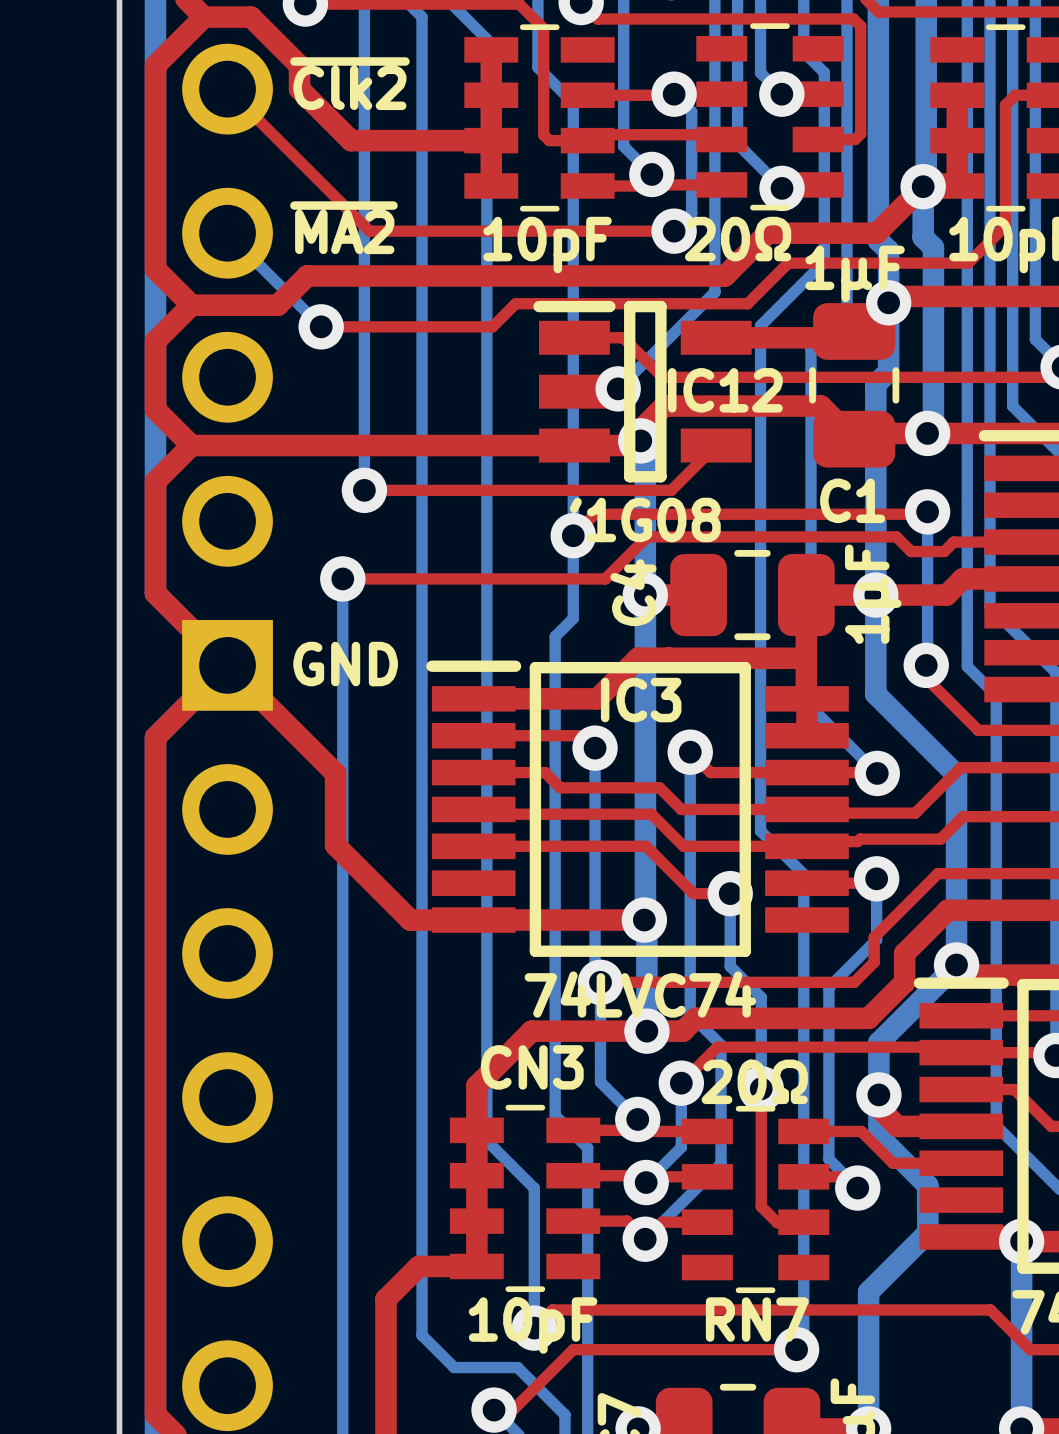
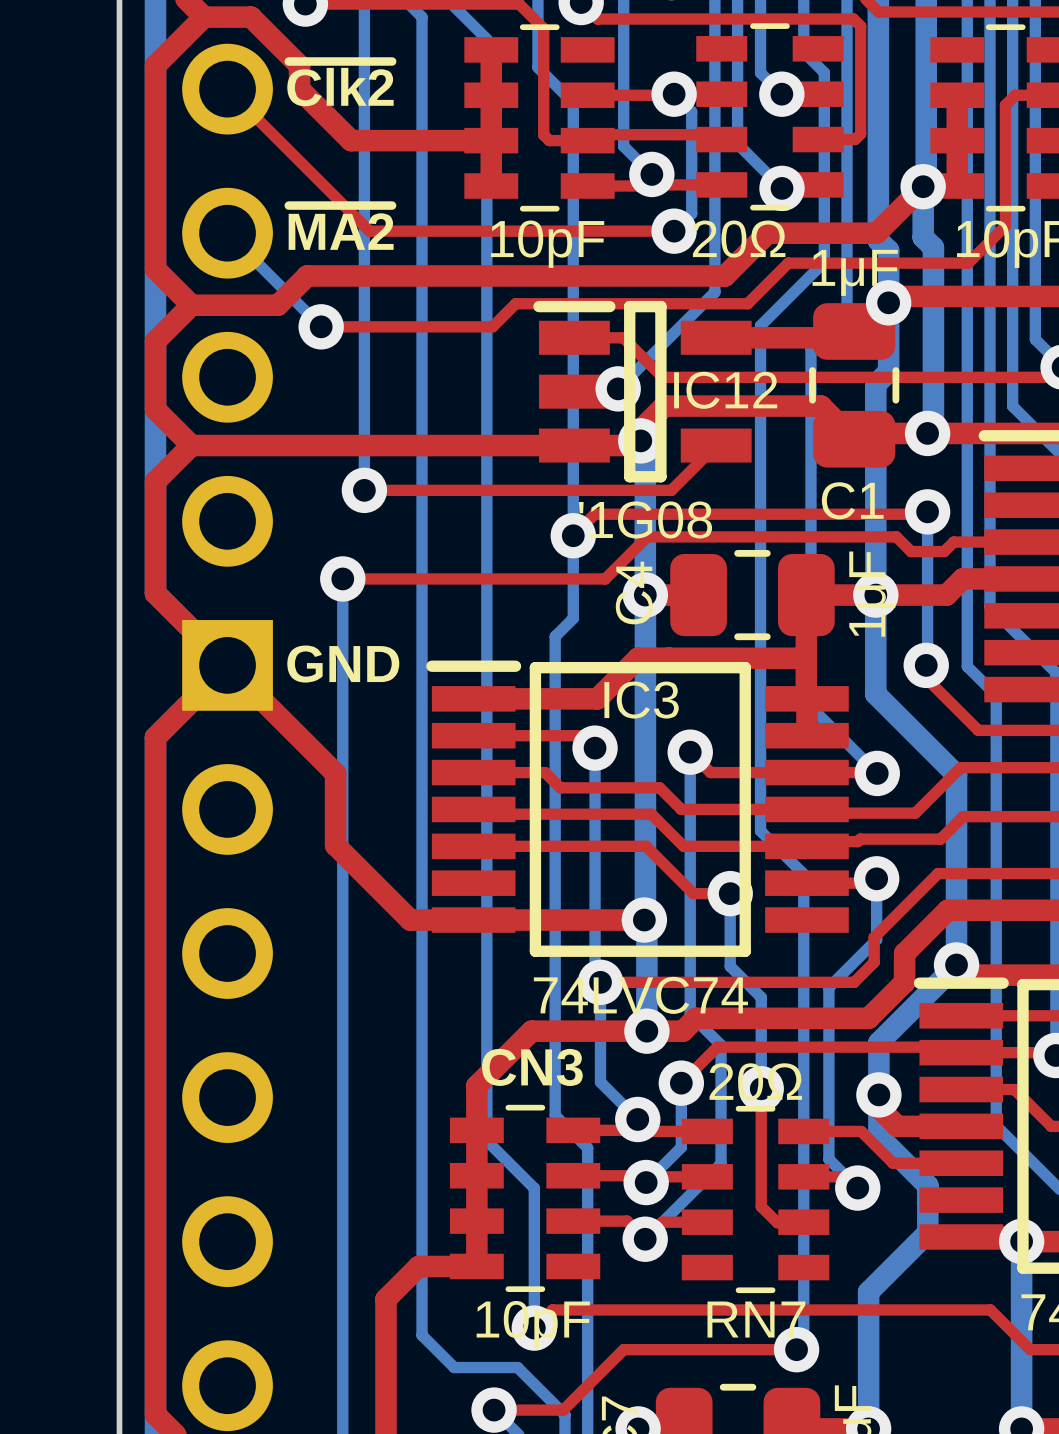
top track: (623, 1349) (573, 1349) (512, 1410) -> (623, 1349) (563, 1410) (512, 1410)

